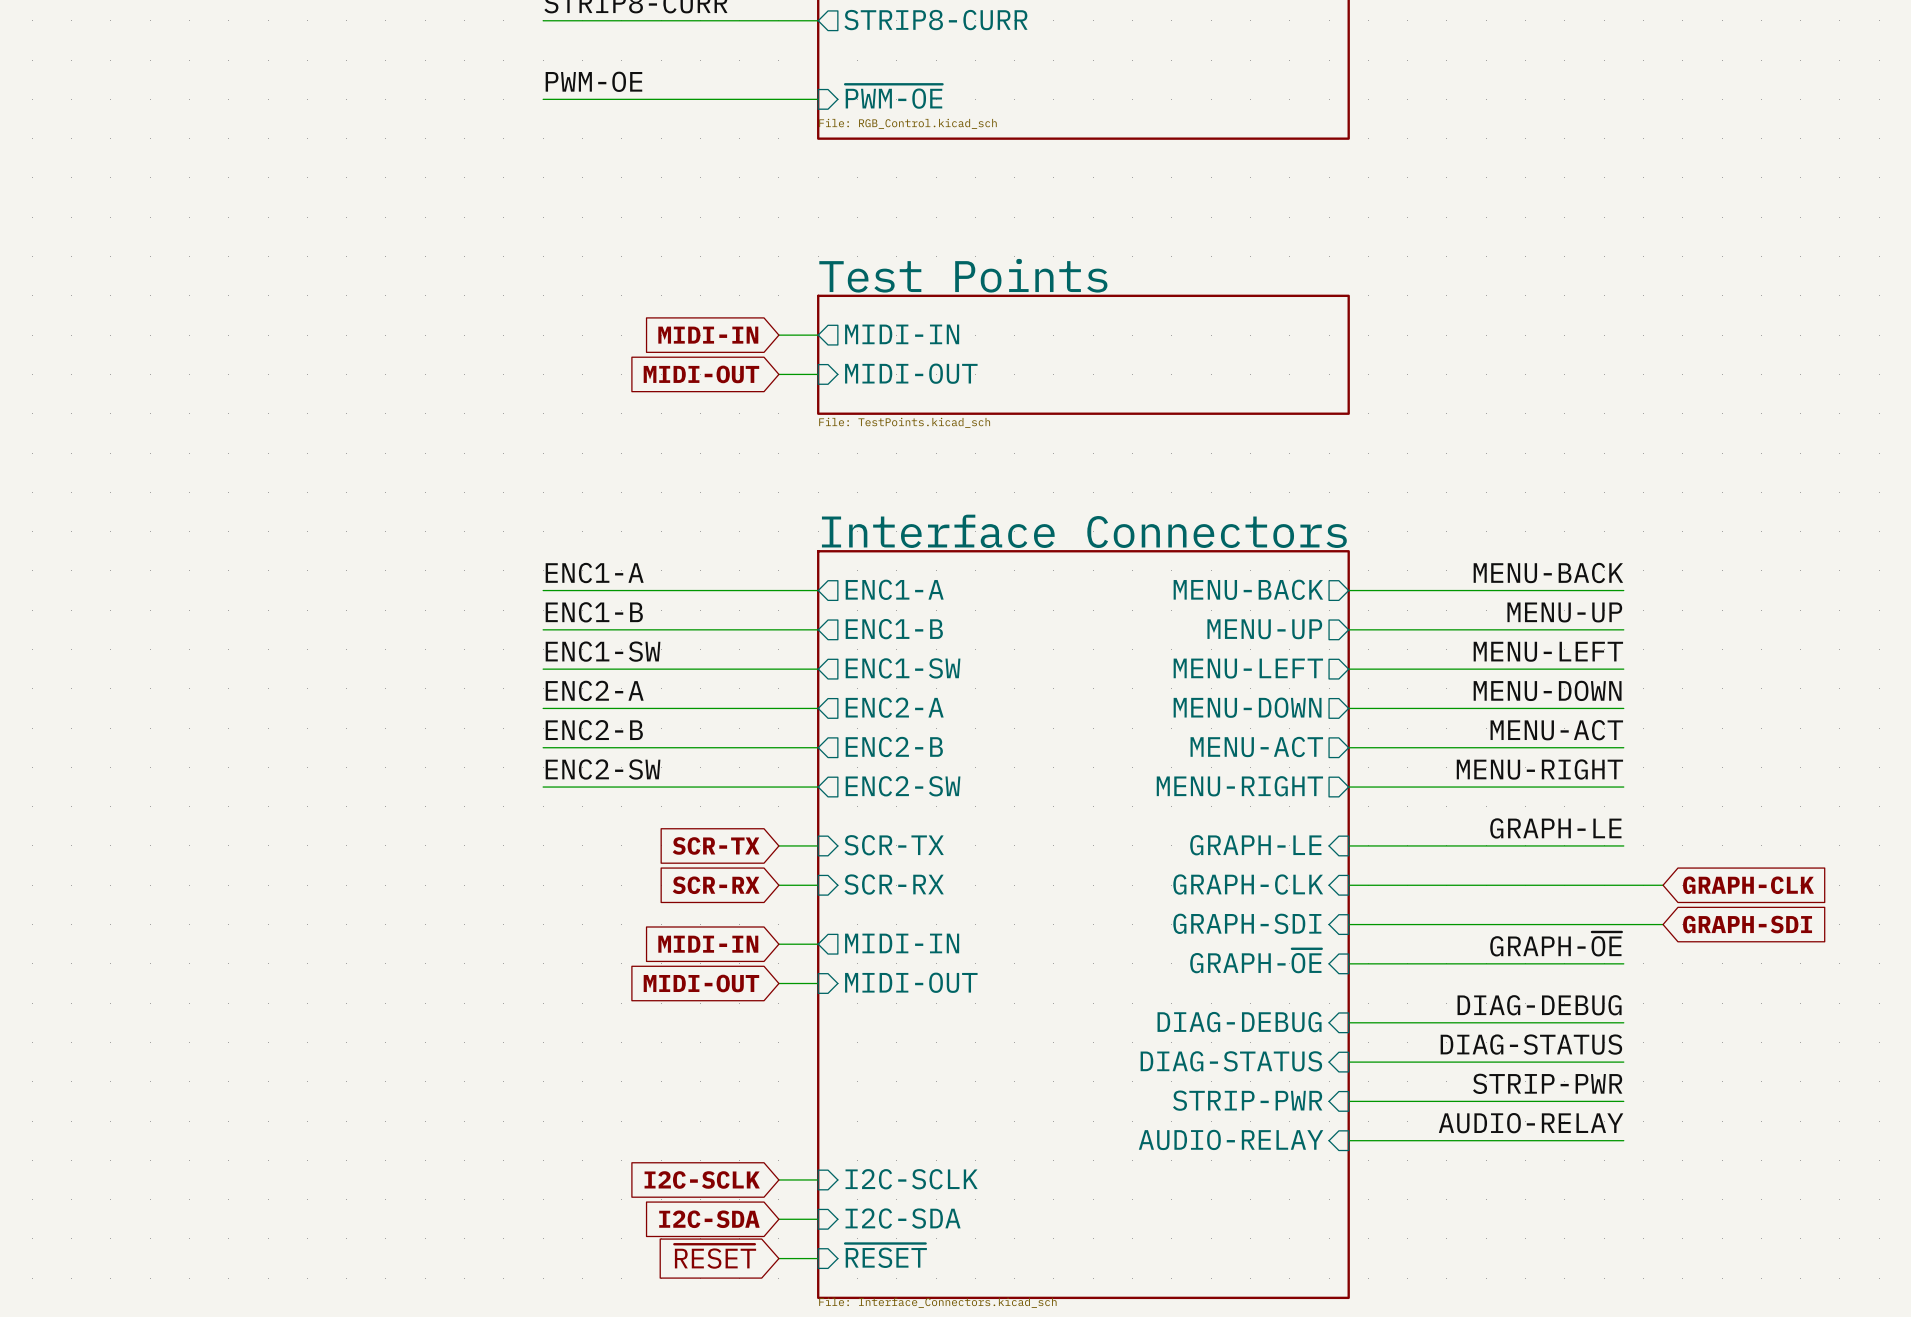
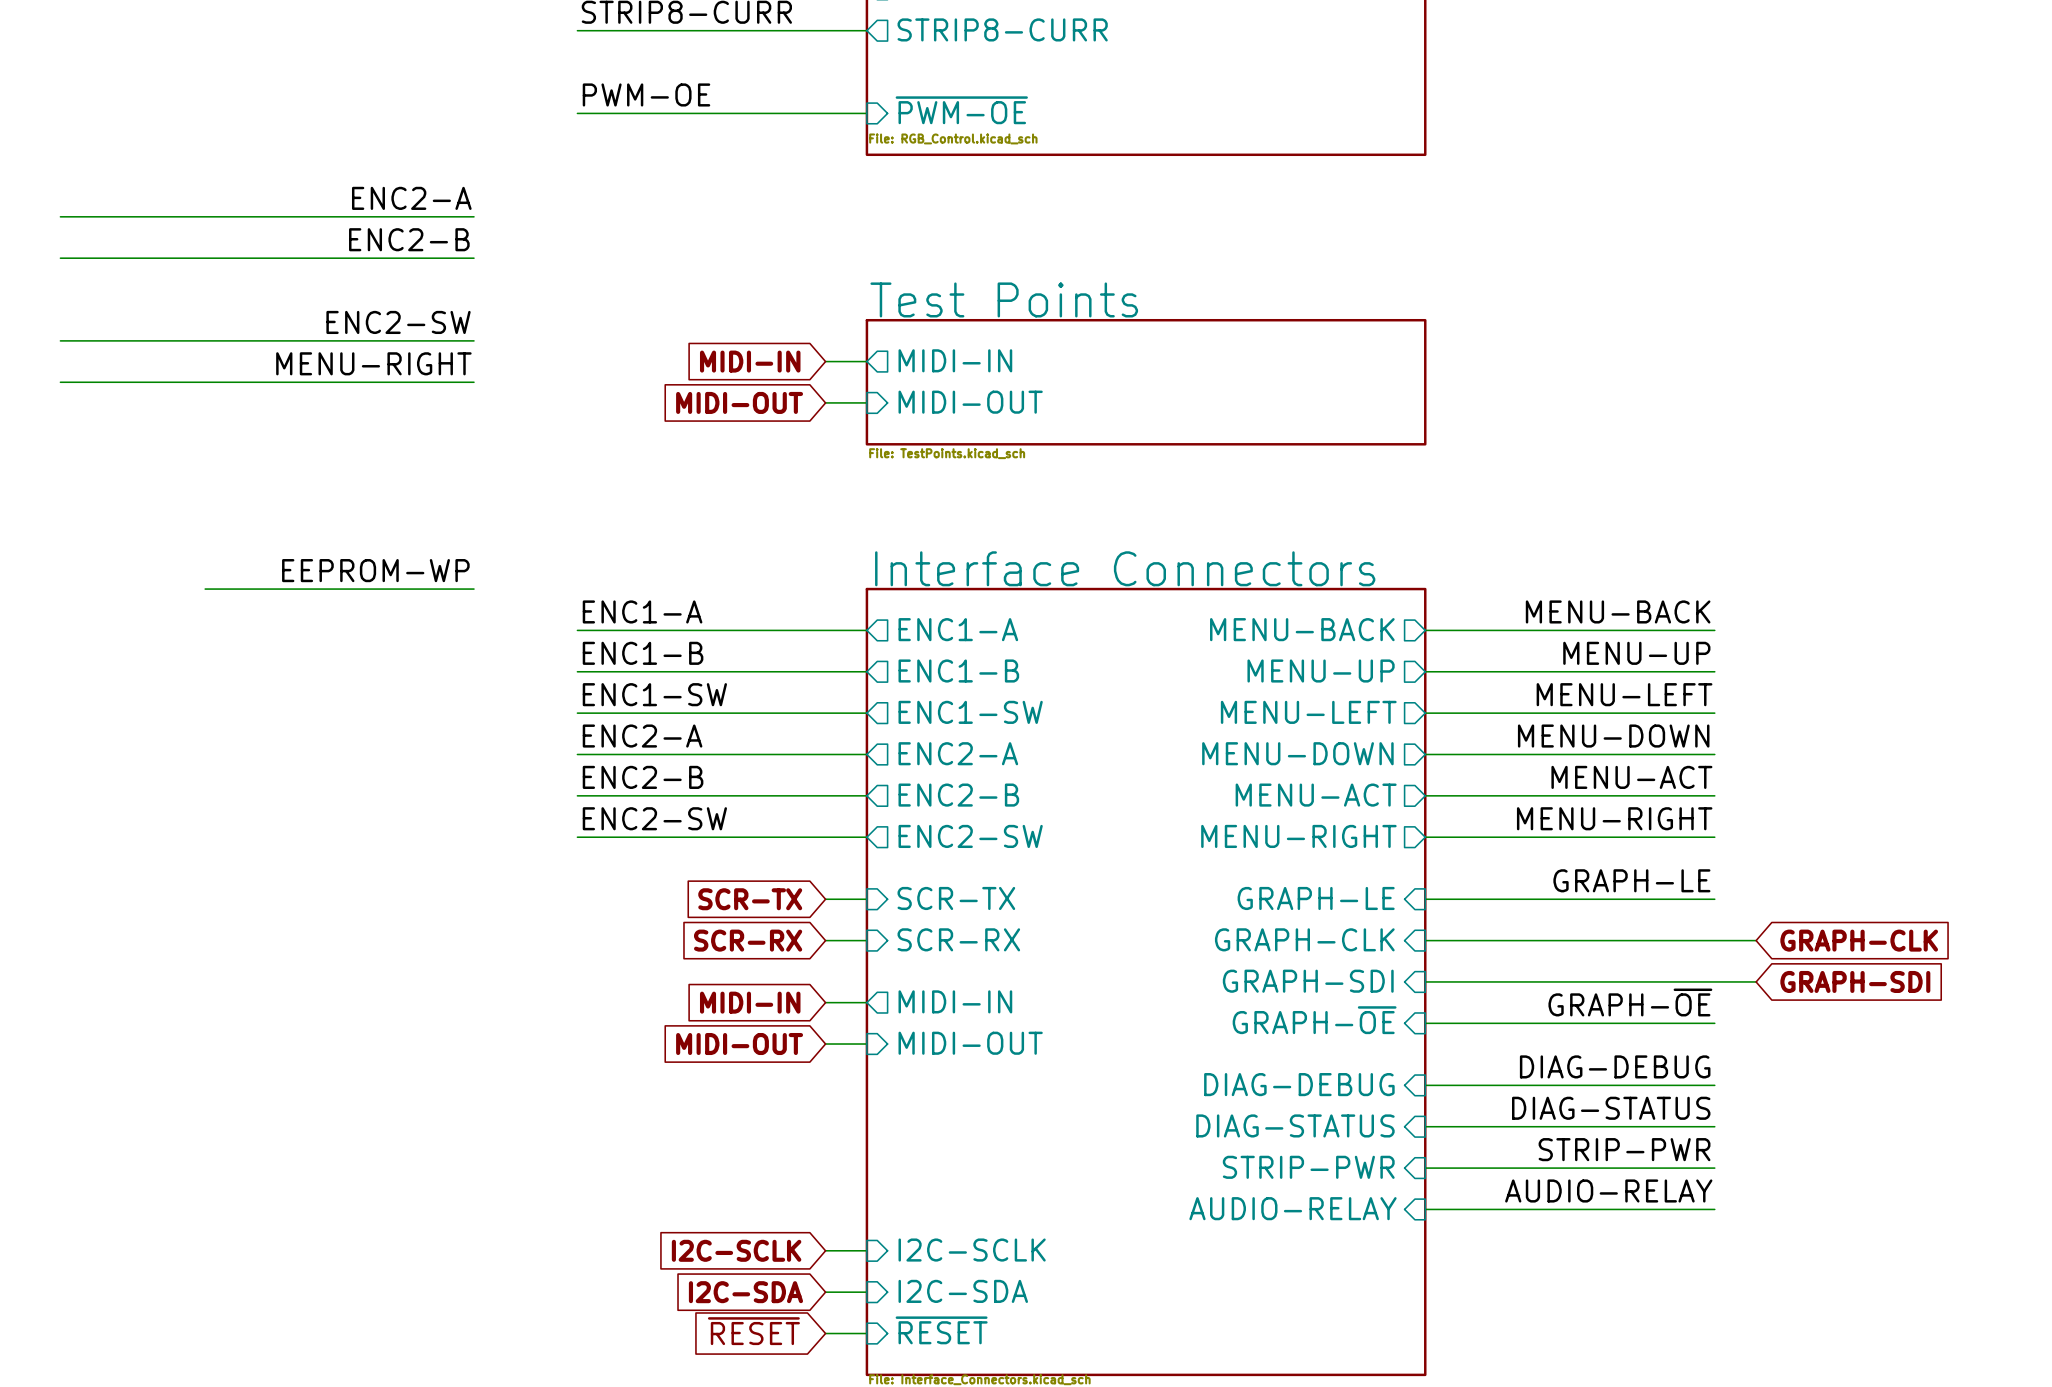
label: none -> ENC2-A (411, 198)
wire: none -> (60, 216) (474, 216)
label: none -> ENC2-B (409, 239)
wire: none -> (60, 258) (474, 258)
label: none -> ENC2-SW (398, 322)
wire: none -> (60, 340) (474, 340)
label: none -> MENU-RIGHT (373, 363)
wire: none -> (60, 382) (474, 382)
label: none -> EEPROM-WP (375, 570)
wire: none -> (205, 589) (474, 589)

